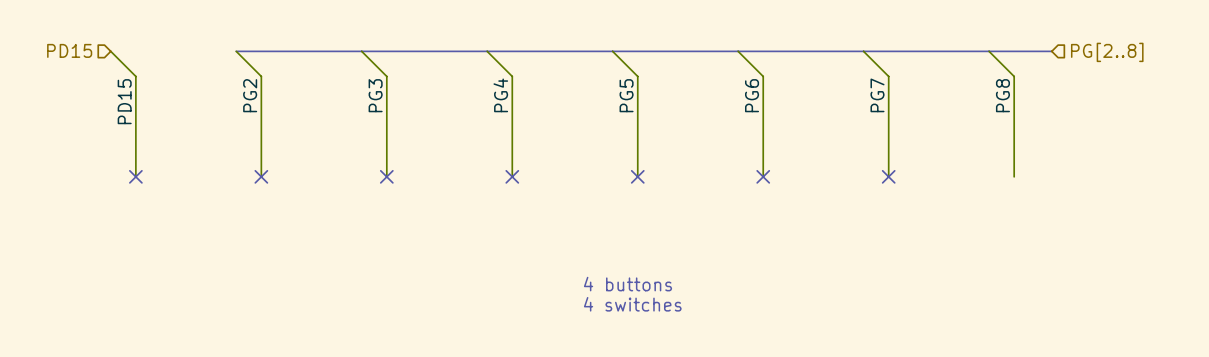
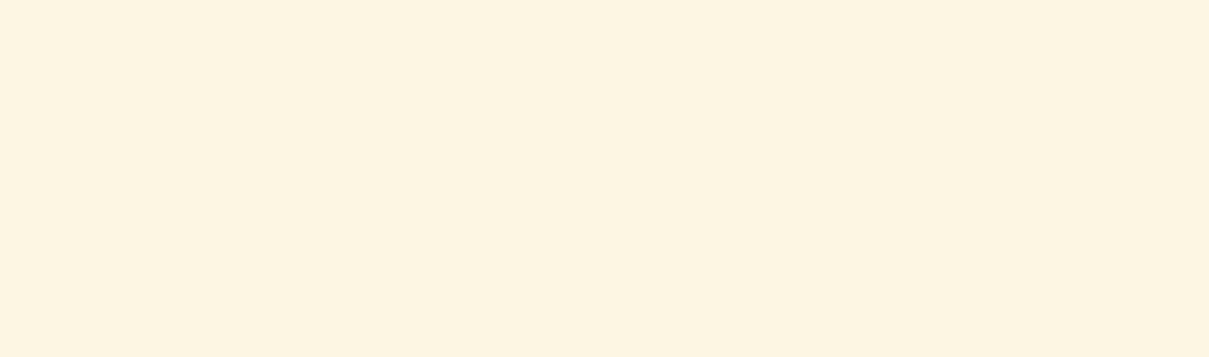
hierarchical label: PD15 (69, 50) -> none
wire: (110, 51) (135, 76) (135, 176) -> none
wire: (236, 51) (261, 76) (261, 176) -> none
bus: (236, 51) (1051, 51) -> none
wire: (361, 51) (386, 76) (386, 176) -> none
wire: (487, 51) (512, 76) (512, 176) -> none
wire: (612, 51) (637, 76) (637, 176) -> none
wire: (738, 51) (763, 76) (763, 176) -> none
wire: (863, 51) (888, 76) (888, 176) -> none
wire: (989, 51) (1014, 76) (1014, 176) -> none
hierarchical label: PG[2..8] (1107, 52) -> none
label: PG2 (250, 95) -> none
label: PG3 (375, 95) -> none
label: PG4 (500, 95) -> none
label: PG5 (626, 95) -> none
label: PG6 (752, 95) -> none
label: PG7 (877, 95) -> none
label: PG8 (1002, 95) -> none
label: PD15 (124, 101) -> none
no-connect mark: (135, 176) -> none
no-connect mark: (261, 176) -> none
no-connect mark: (386, 176) -> none
no-connect mark: (512, 176) -> none
no-connect mark: (637, 176) -> none
no-connect mark: (763, 176) -> none
no-connect mark: (888, 176) -> none
text: 4 buttons (627, 284) -> none
text: 4 switches (632, 304) -> none

